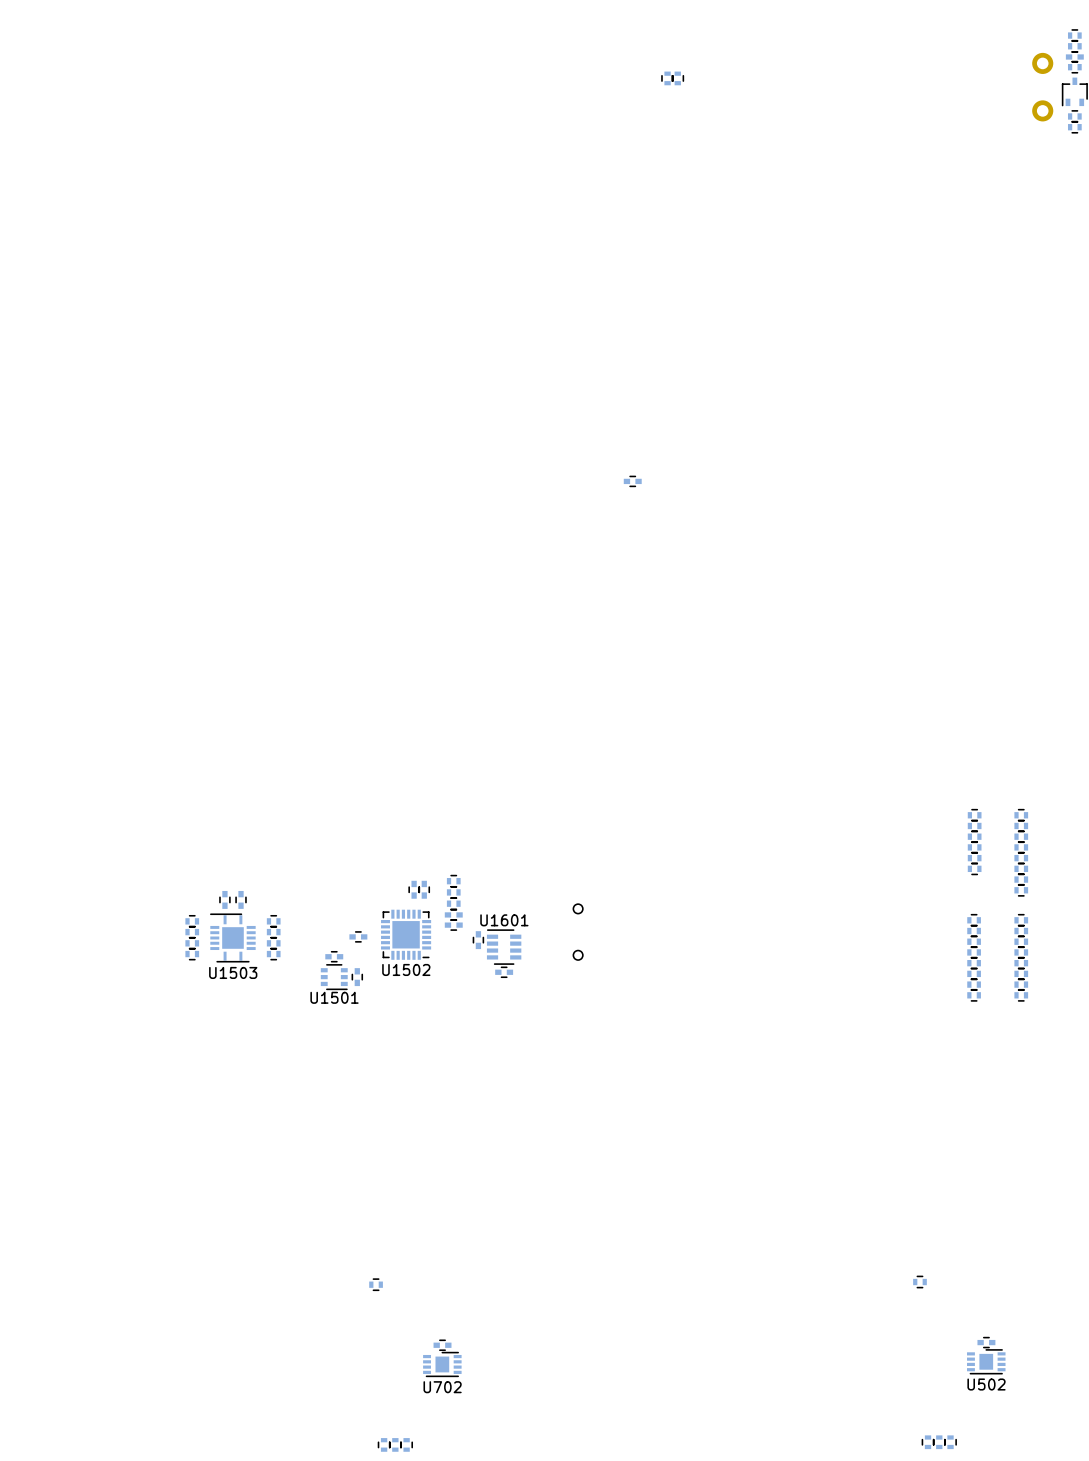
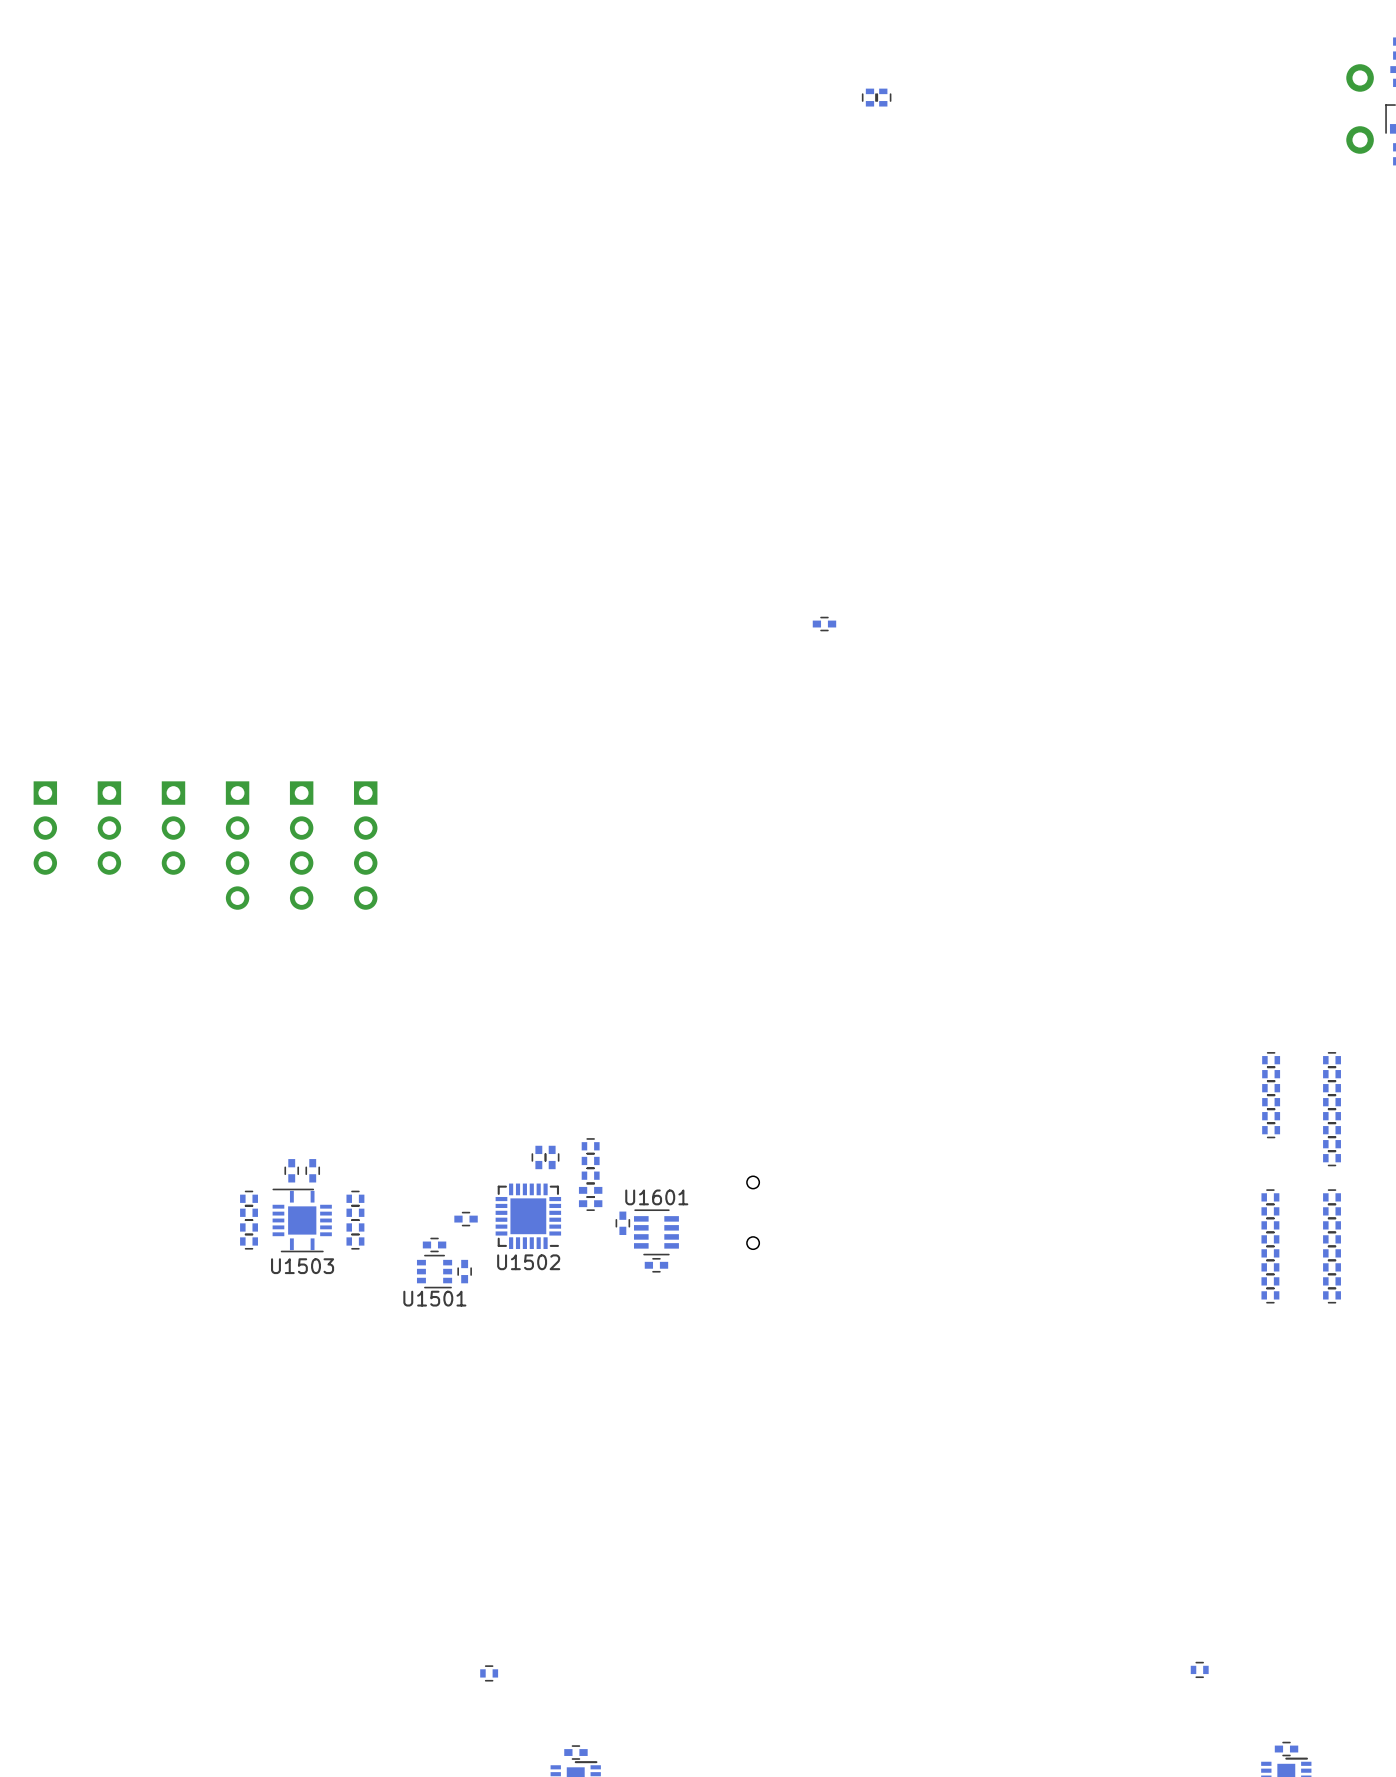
part: none -> (45, 828)
part: none -> (109, 828)
part: none -> (173, 828)
part: none -> (237, 845)
part: none -> (301, 845)
part: none -> (365, 845)

